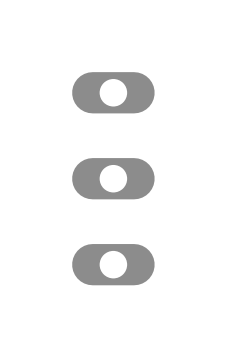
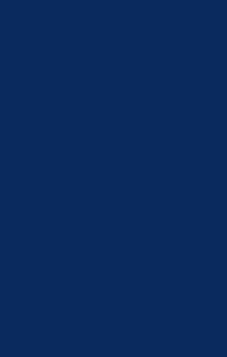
part: (113, 178) -> none

